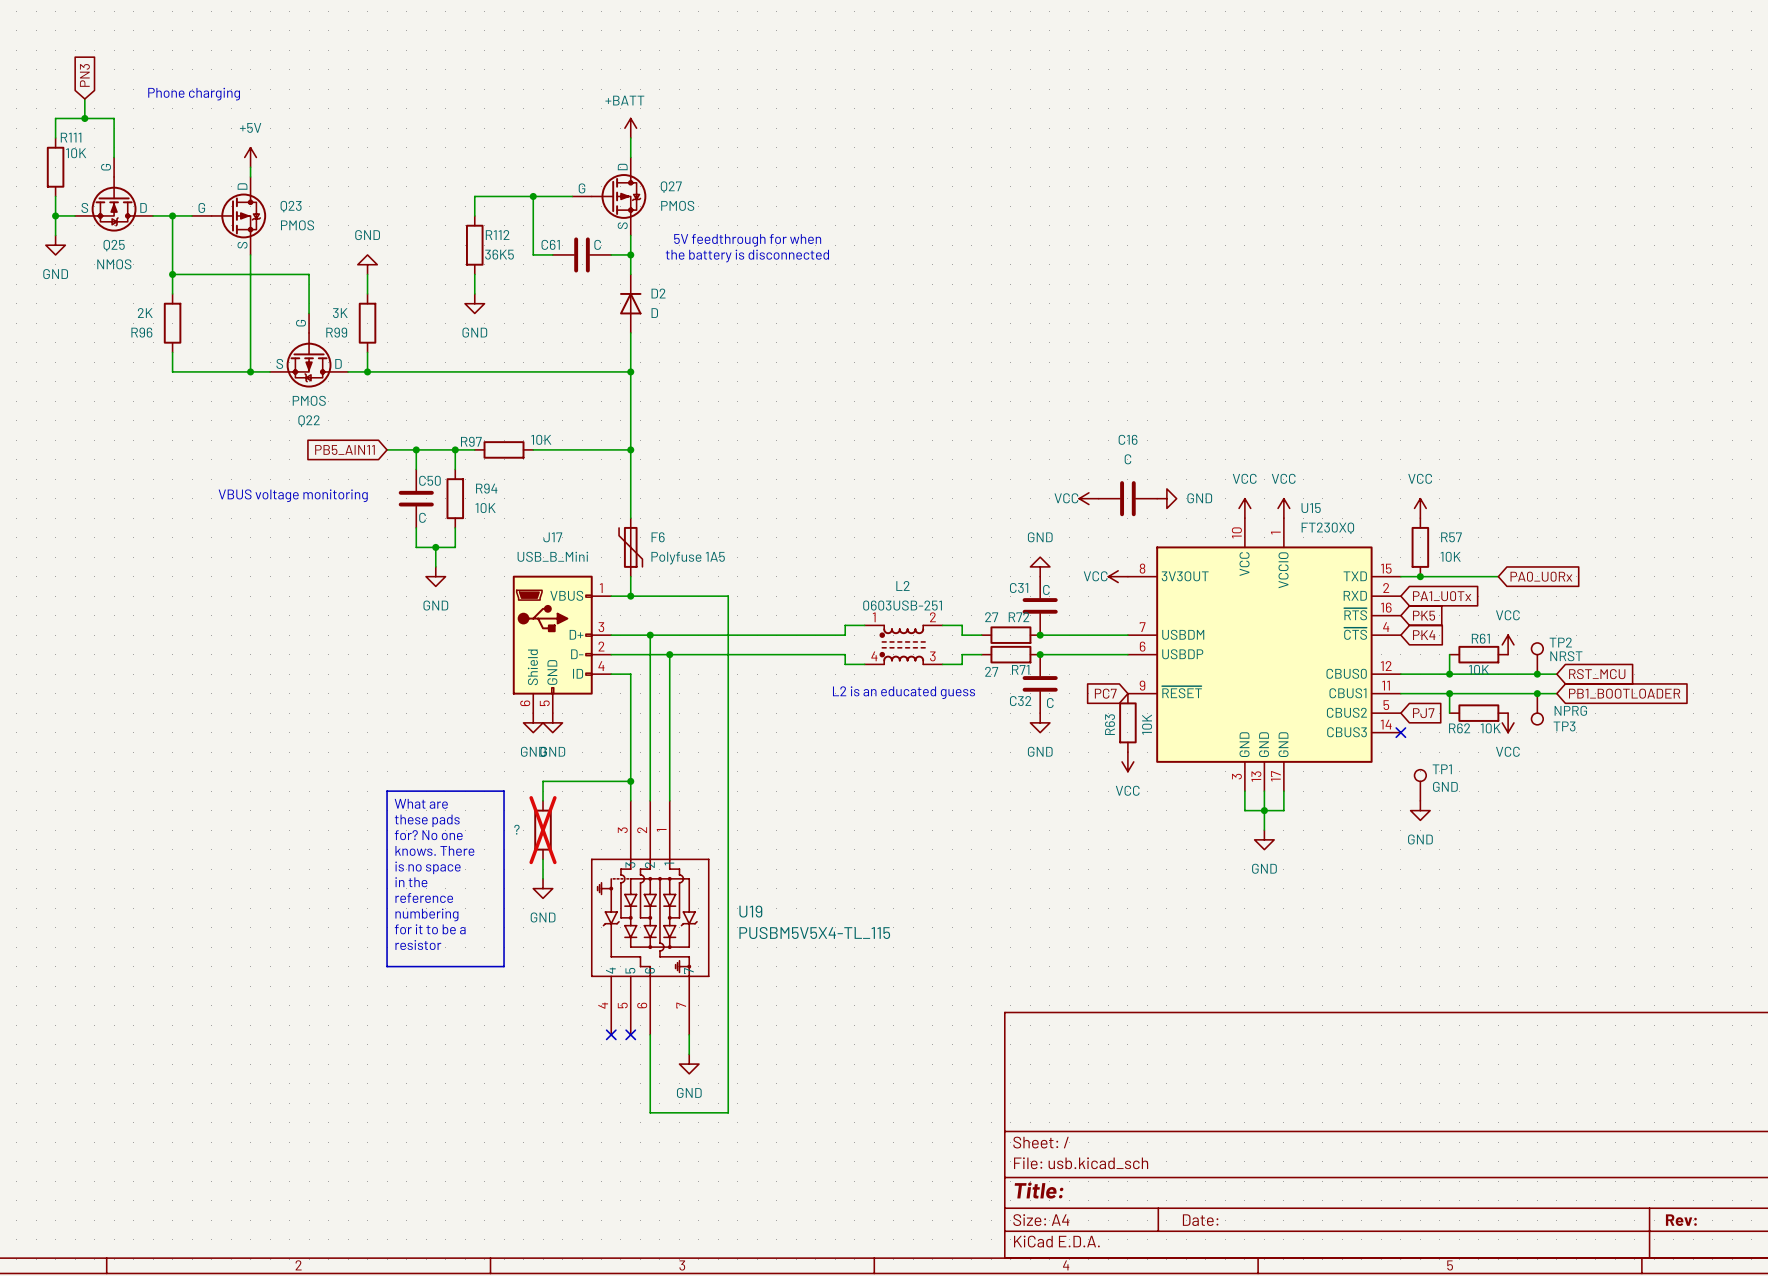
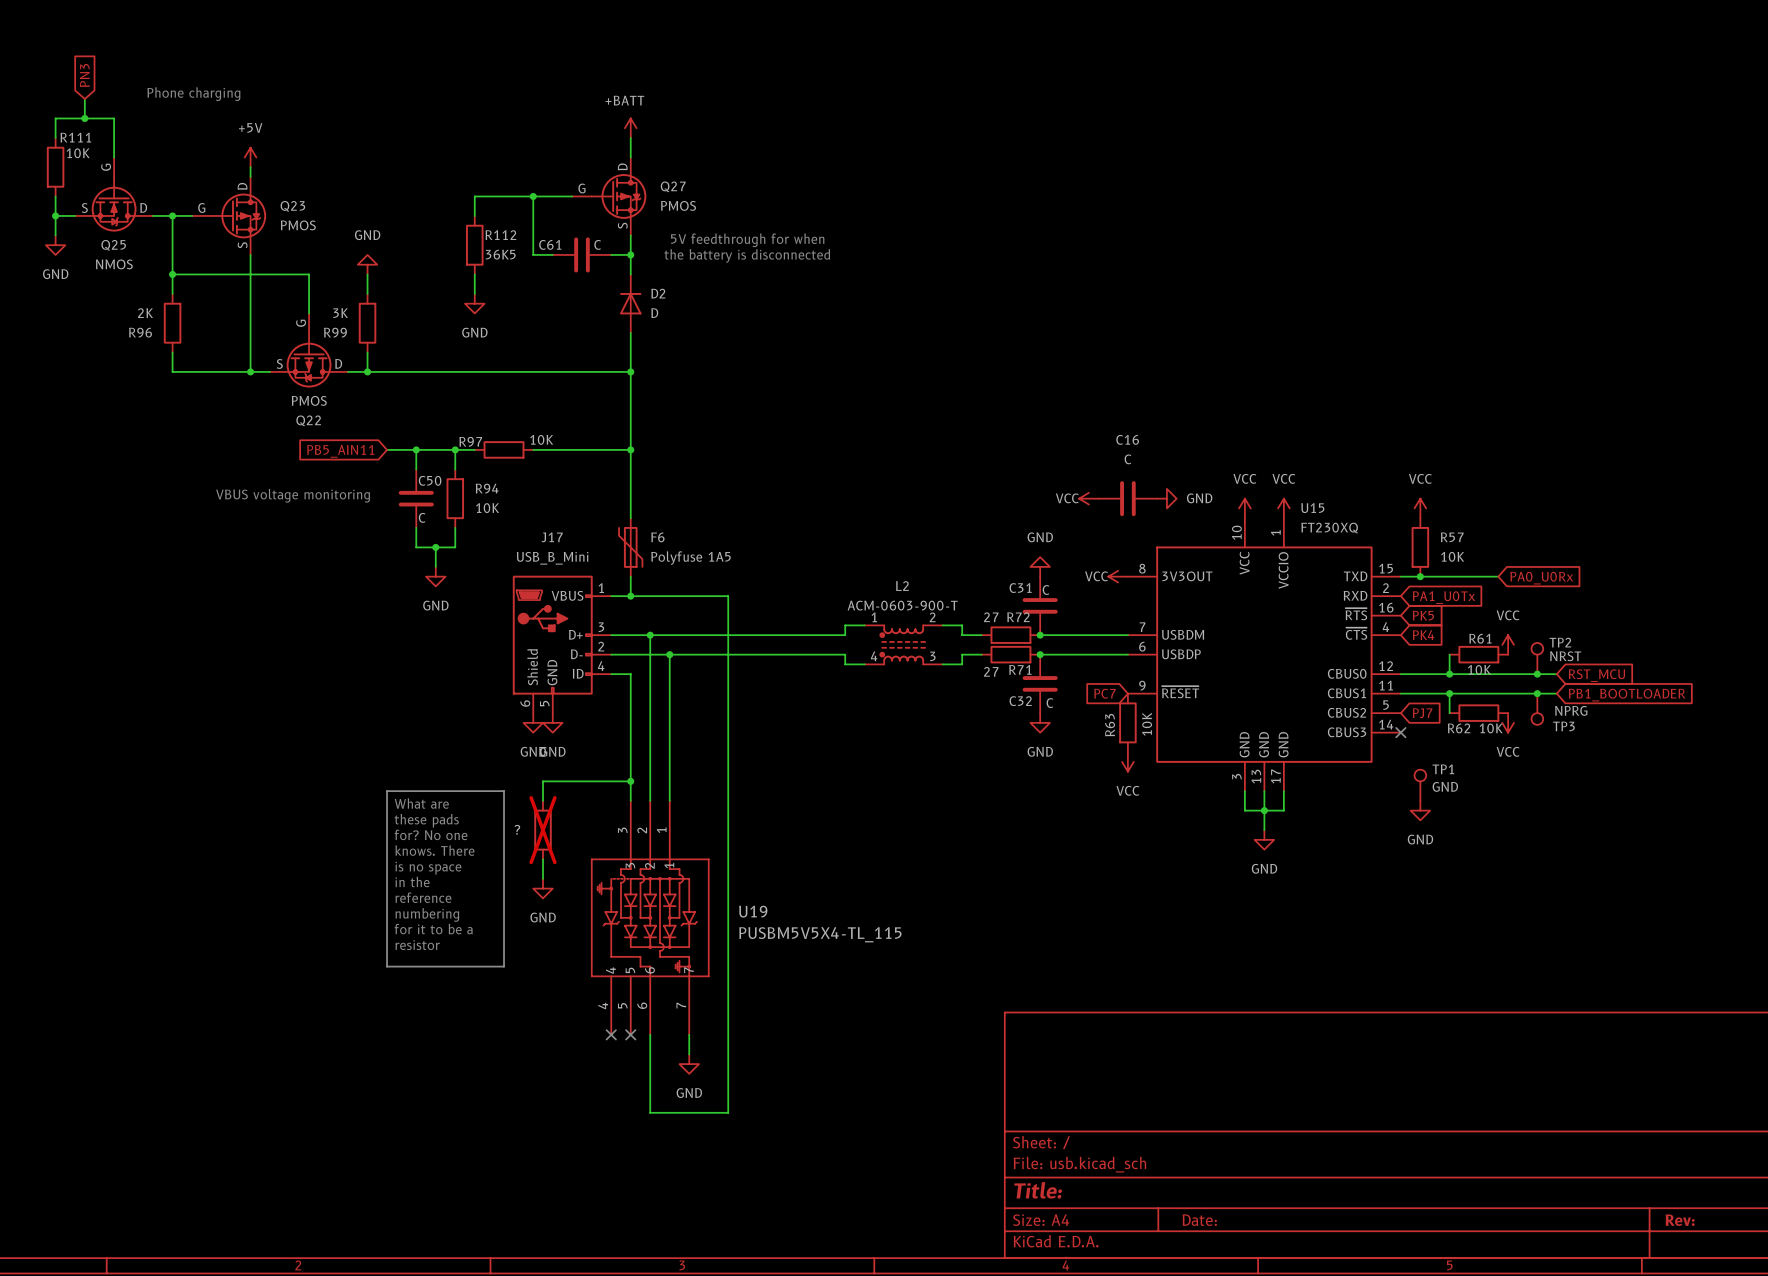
L2 value: 0603USB-251 (902, 605) -> ACM-0603-900-T (902, 605)
text: L2 is an educated guess (904, 692) -> none

